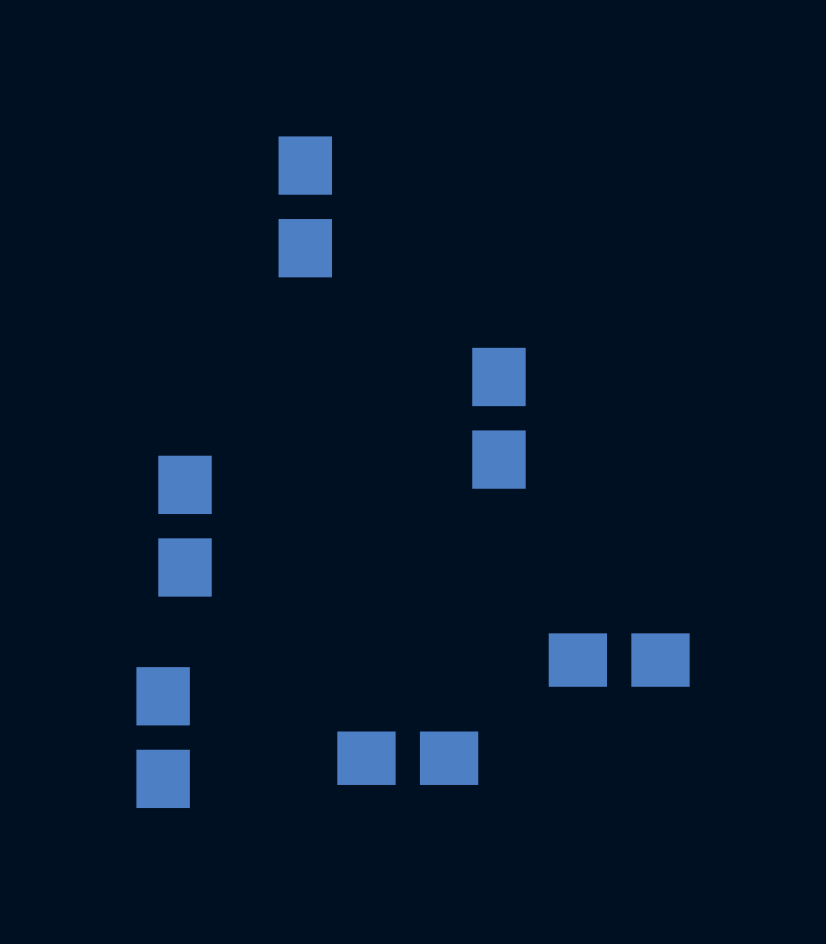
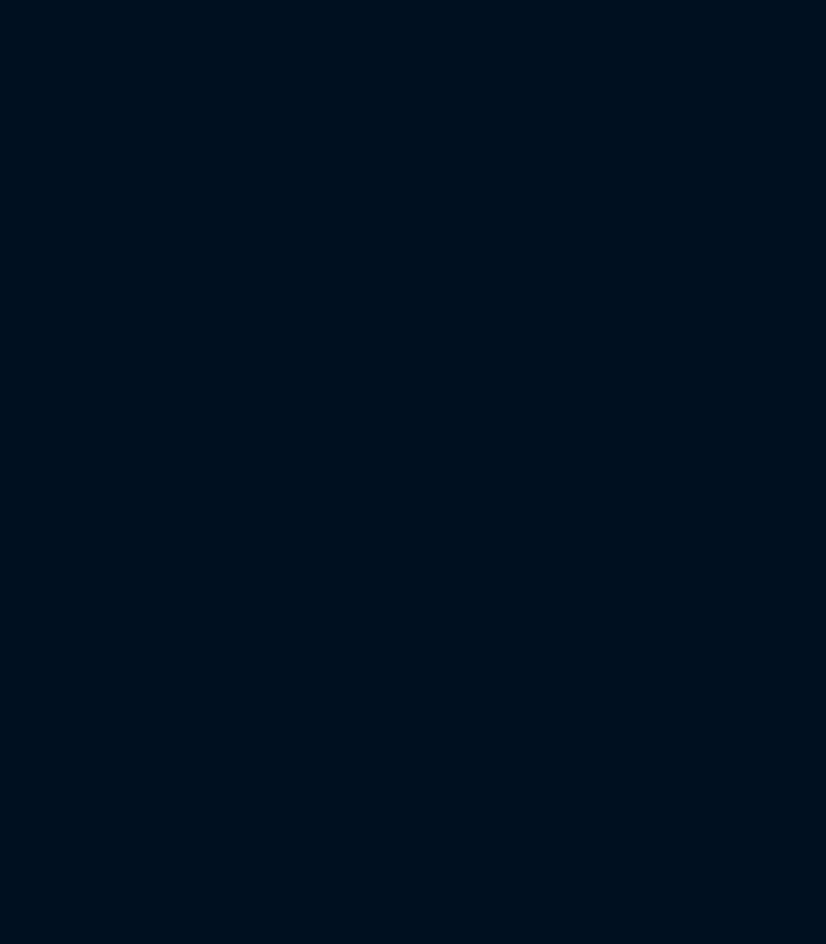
part: (305, 206) -> none
part: (498, 418) -> none
part: (185, 526) -> none
part: (619, 660) -> none
part: (163, 737) -> none
part: (407, 758) -> none

